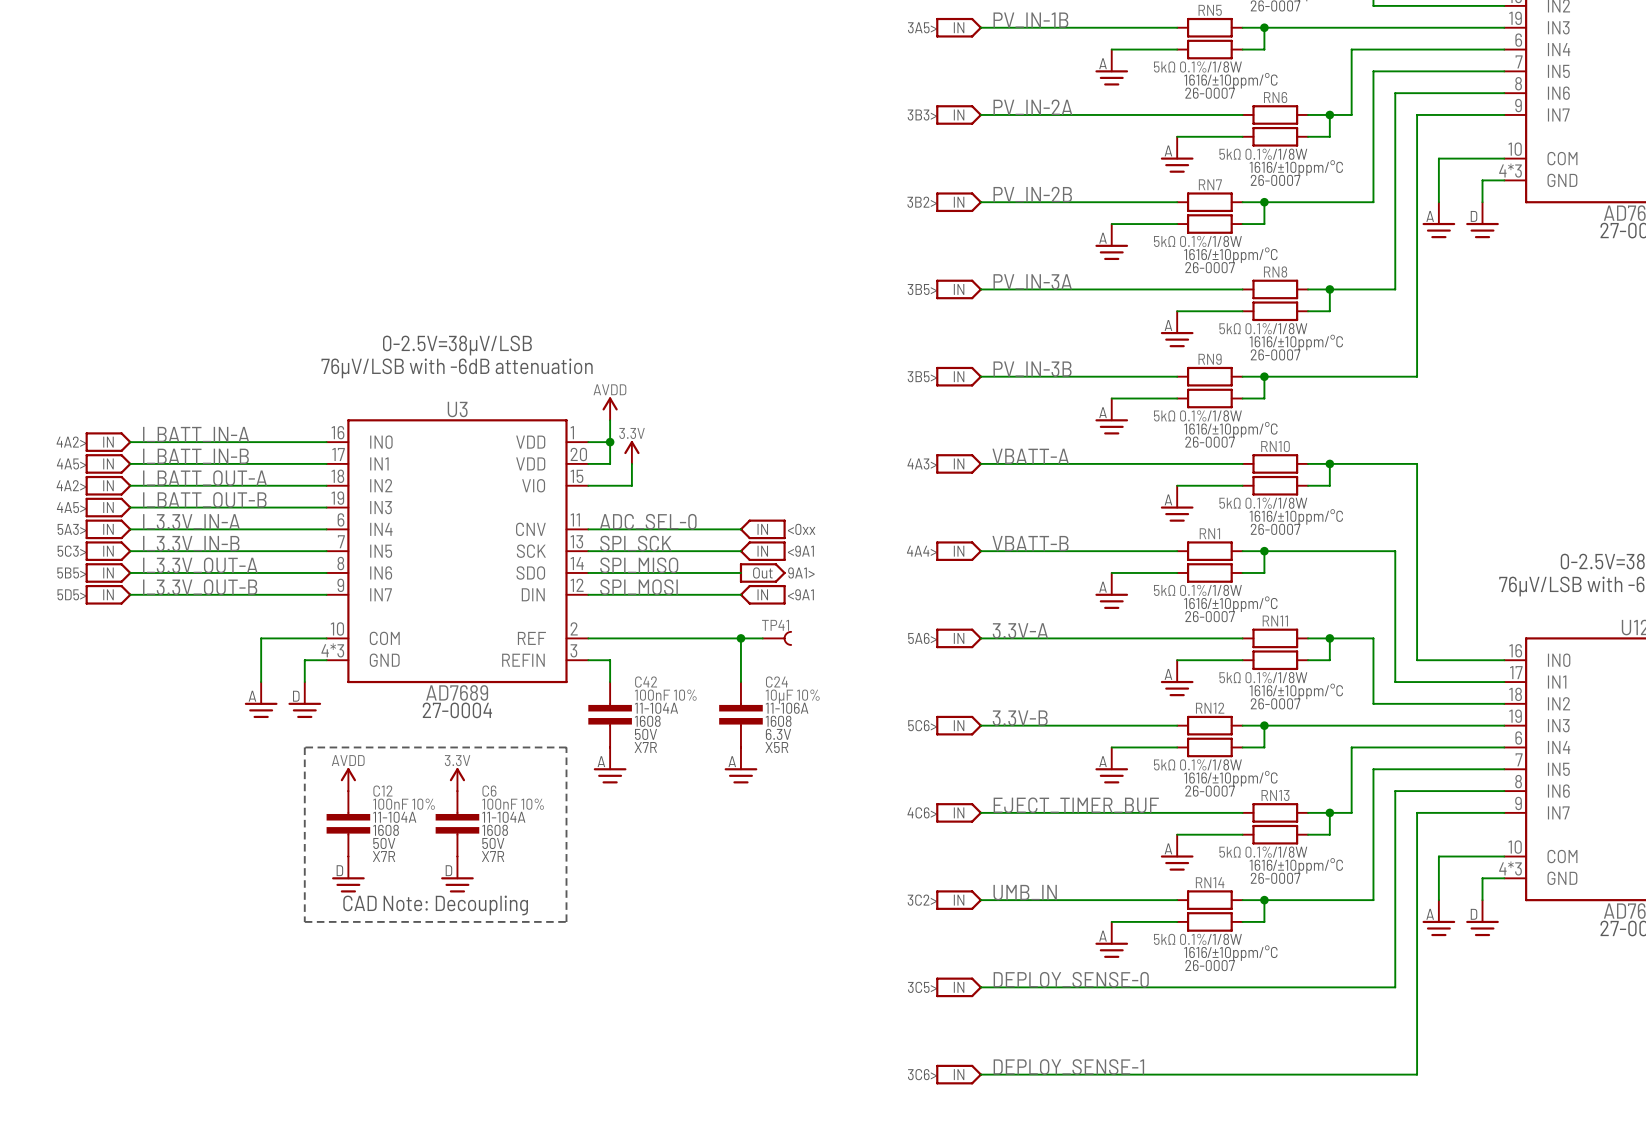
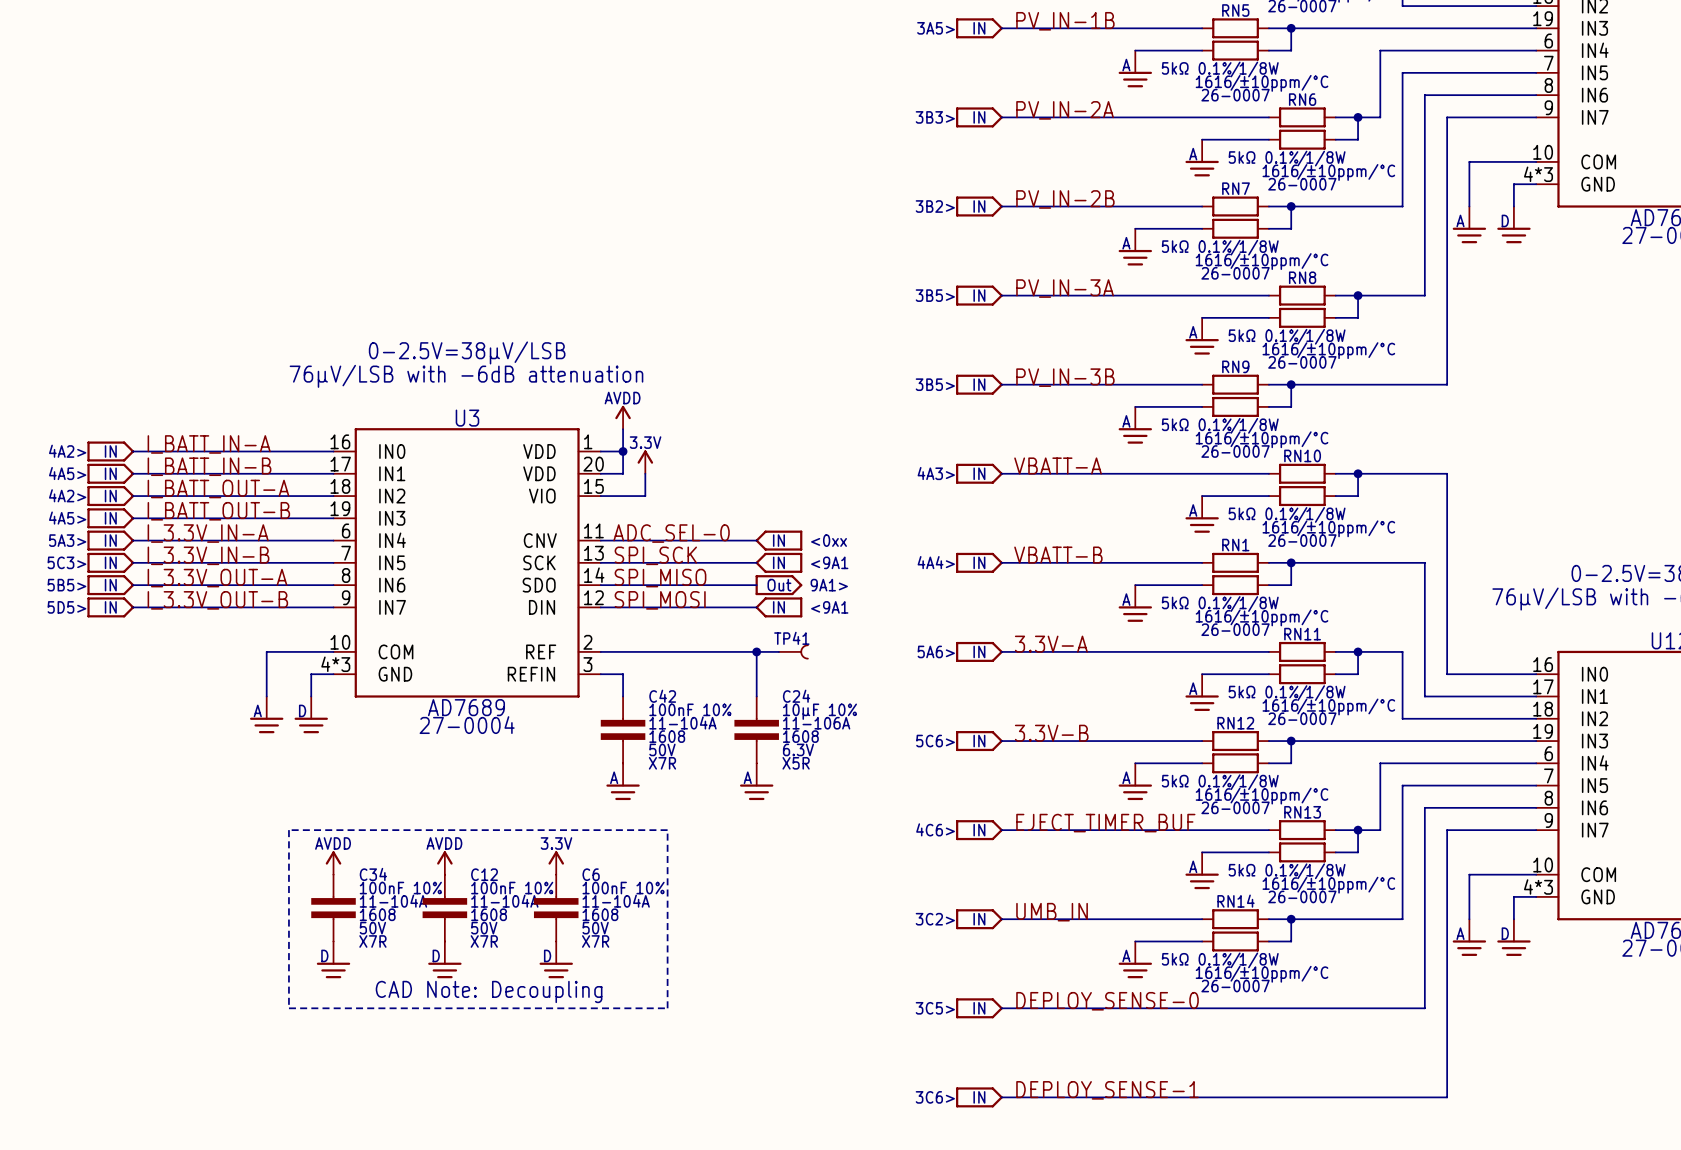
line: (304, 747) (304, 921) (566, 921) (566, 747) (304, 747) -> none
power symbol: AVDD (348, 779) -> none
power symbol position: 3.3V (457, 779) -> 3.3V (556, 862)
line: none -> (288, 830) (288, 1008) (667, 1008) (667, 830) (288, 830)
C12 position: (348, 823) -> (444, 908)
C6 position: (457, 823) -> (556, 908)
power symbol: none -> AVDD (333, 862)
power symbol: none -> AVDD (444, 862)
power symbol: (348, 874) -> none
power symbol: (457, 874) -> none
C34: none -> 100nF 10% (333, 908)
text position: CAD Note: Decoupling (435, 905) -> CAD Note: Decoupling (489, 991)
power symbol: none -> (333, 959)
power symbol: none -> (444, 959)
power symbol: none -> (556, 959)

